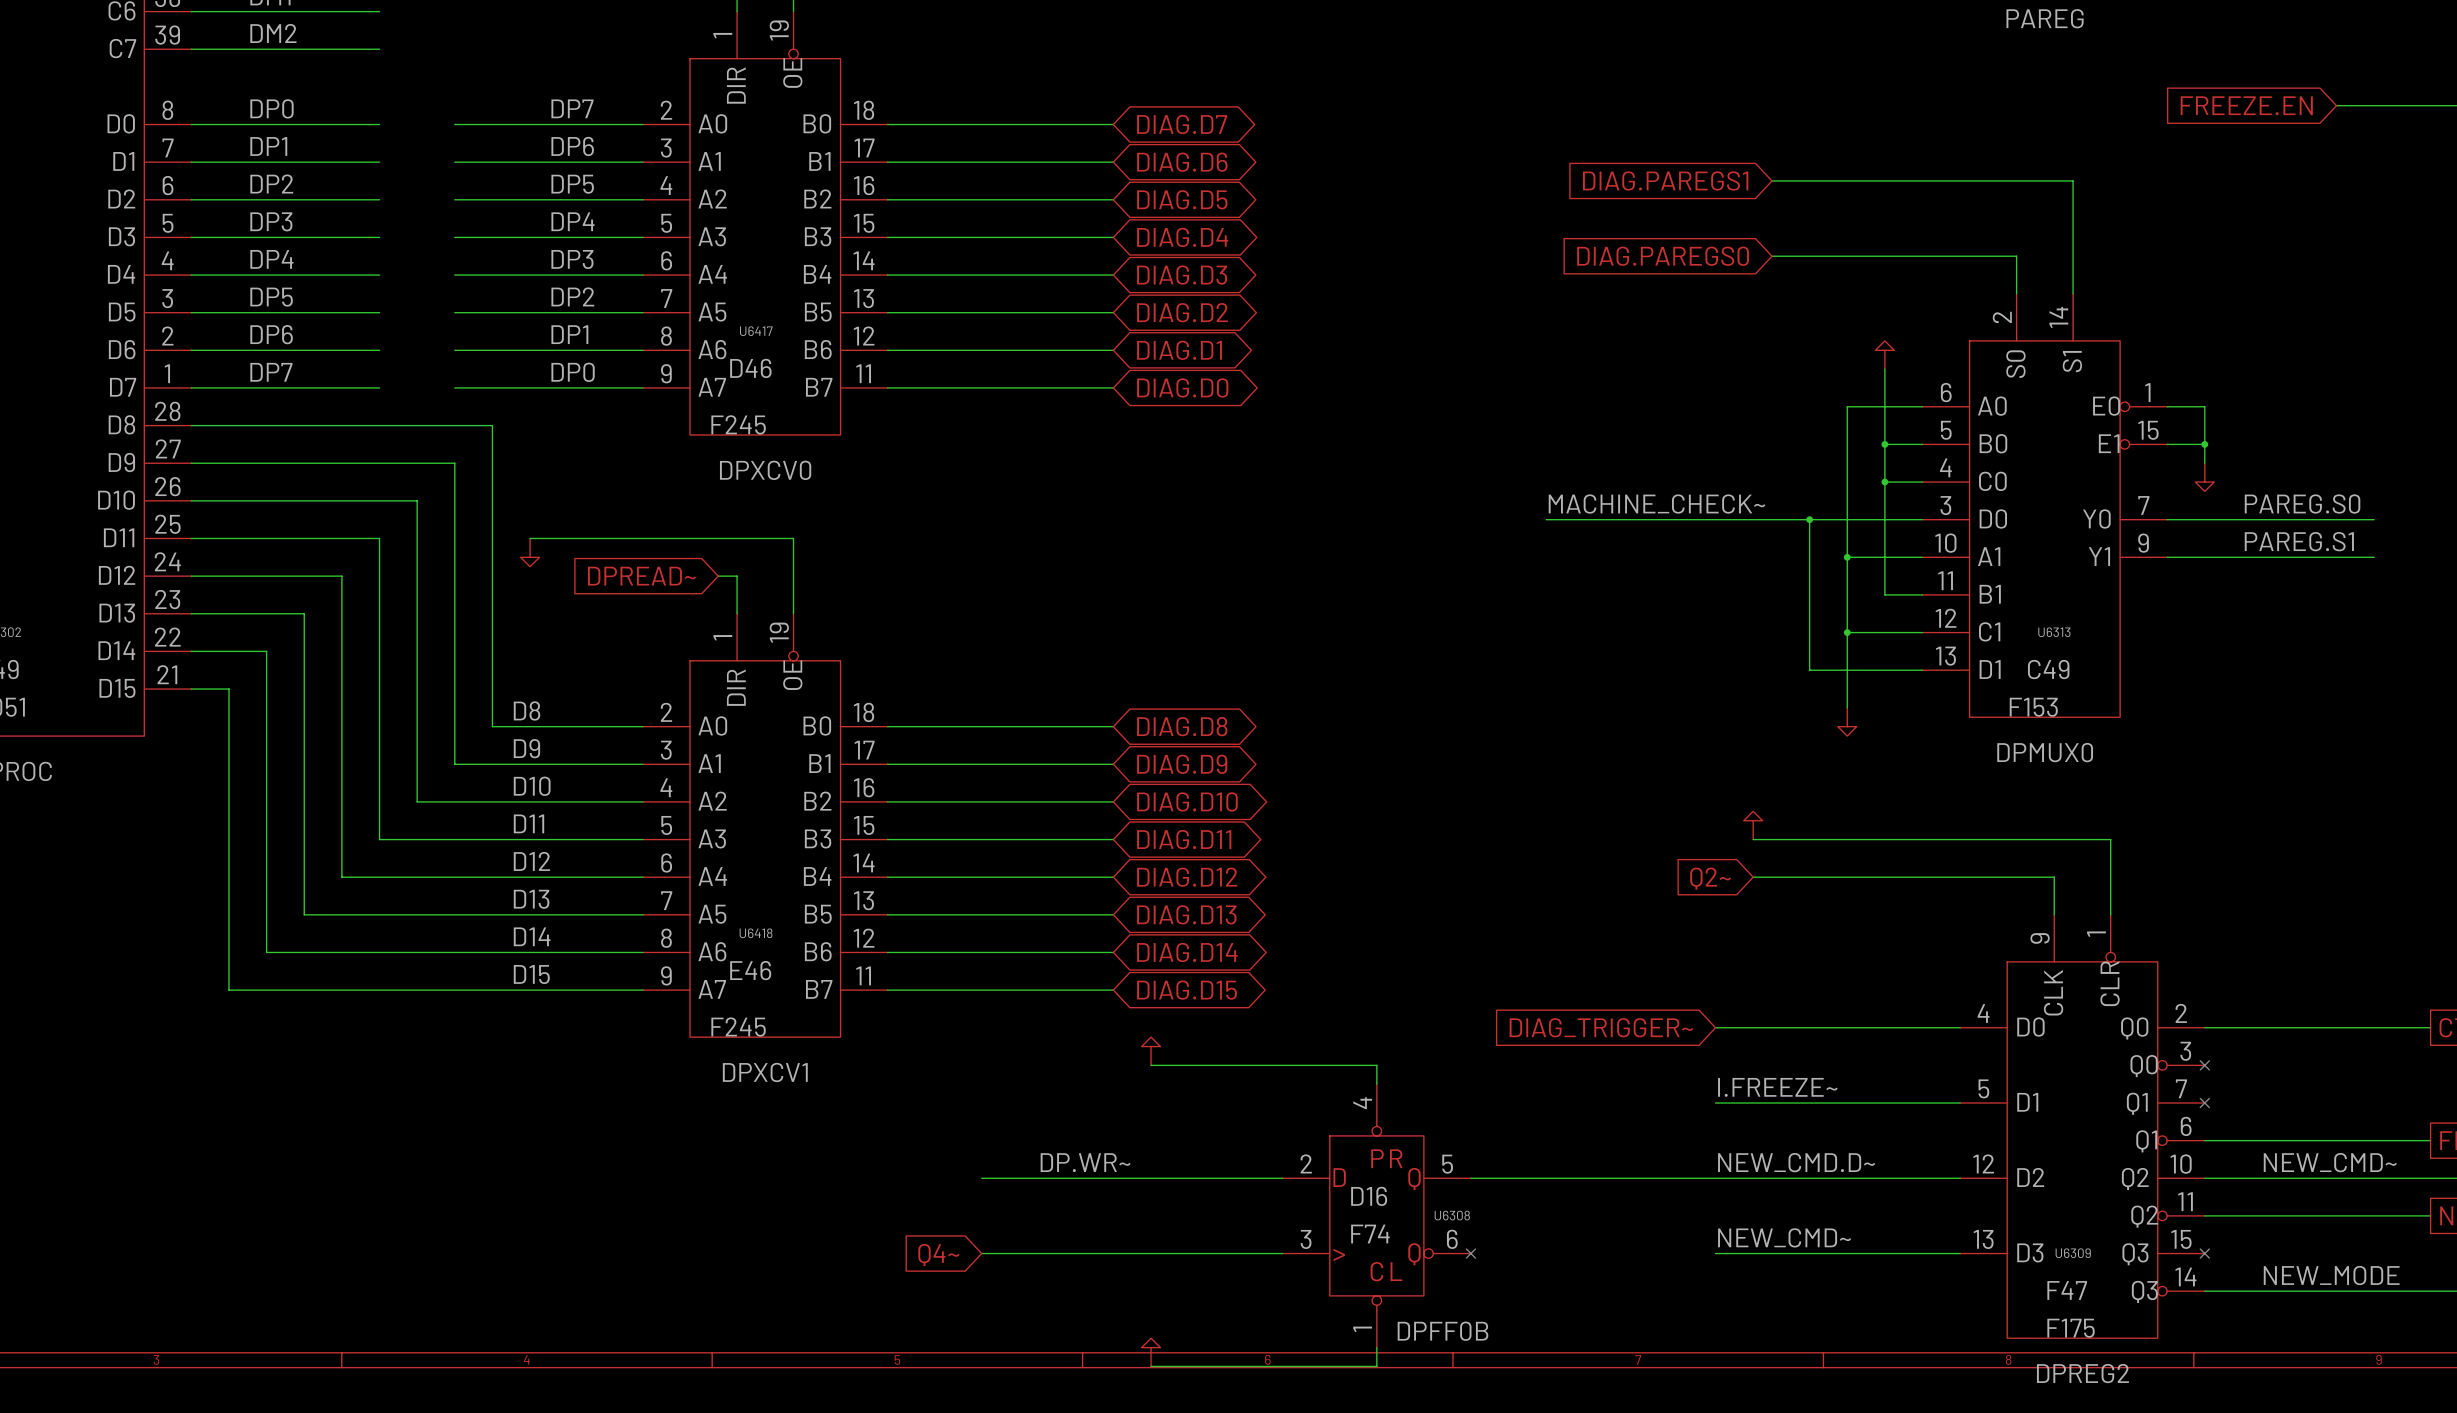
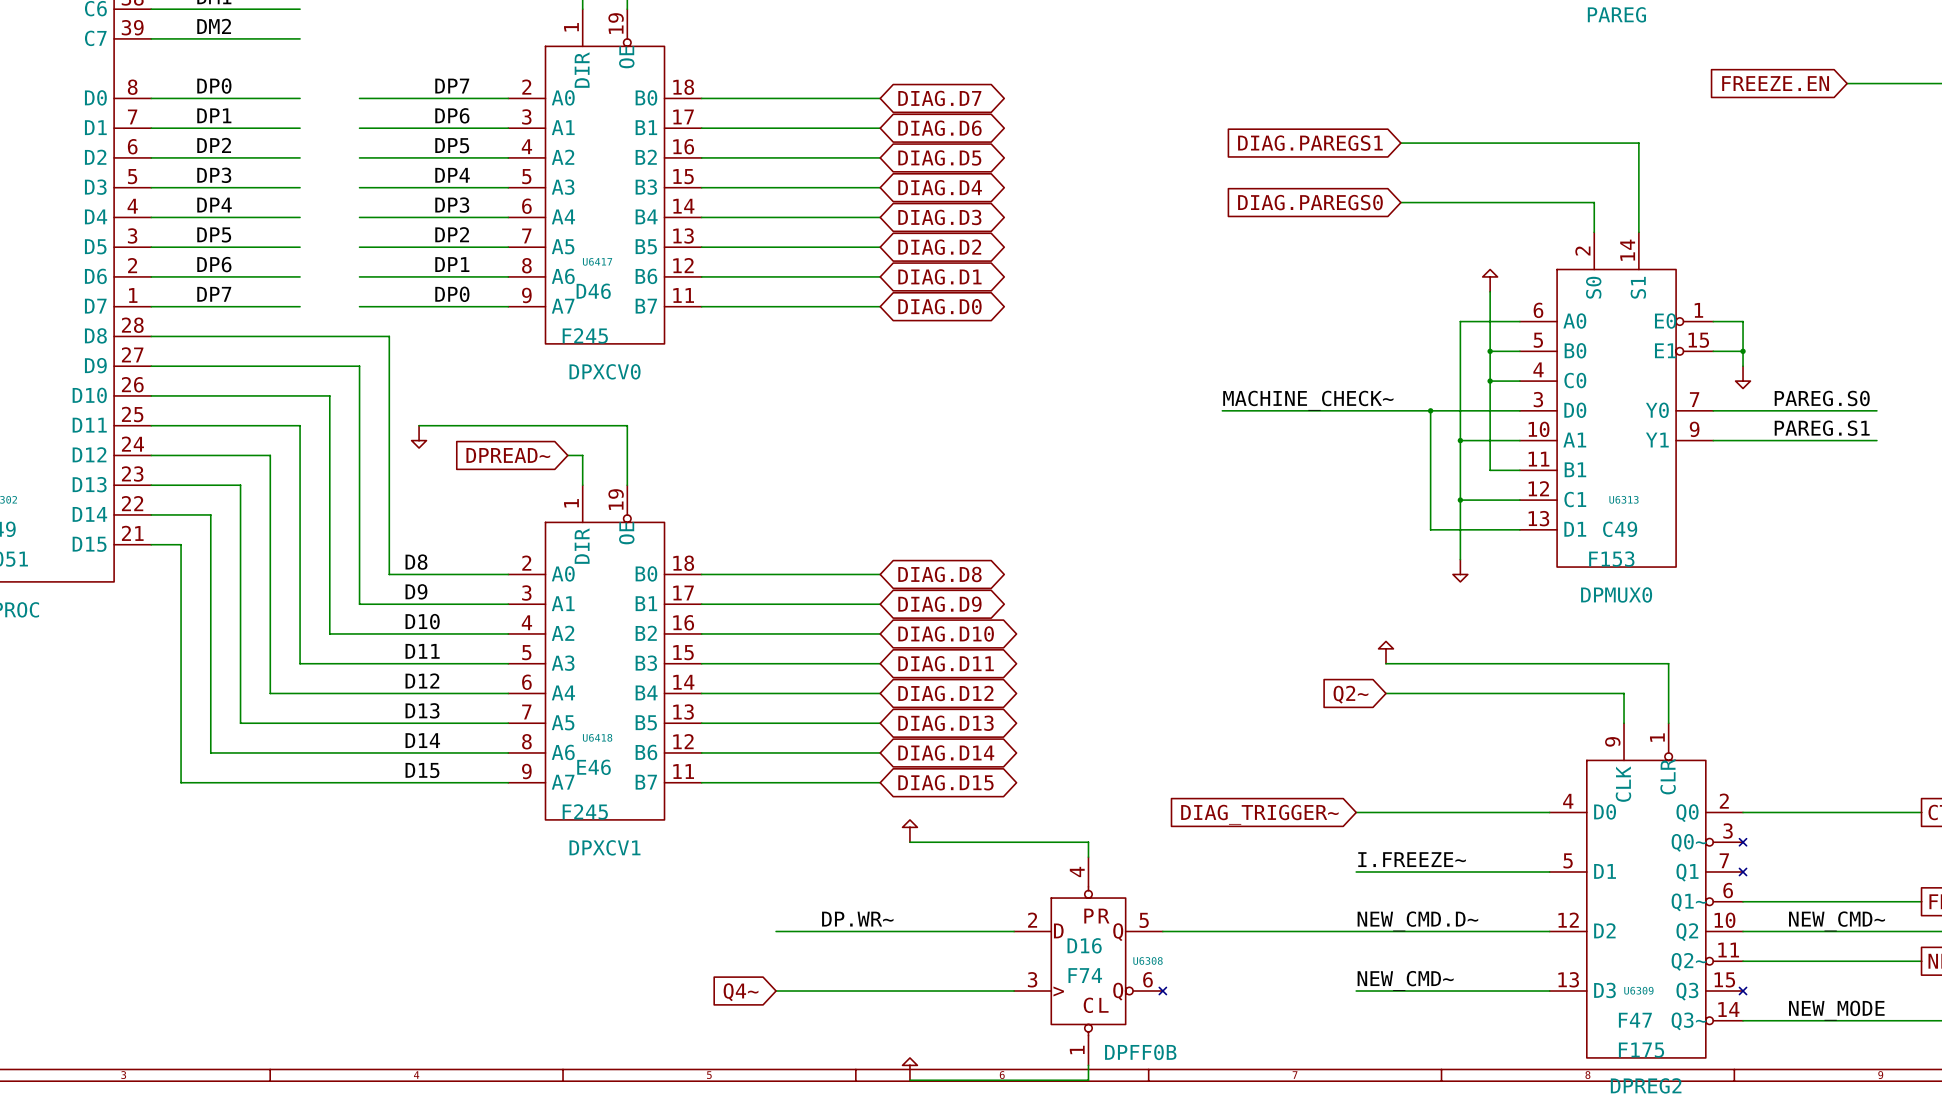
U6309 pin name: Q0 (2144, 1066) -> Q0~ (1689, 842)
U6309 pin name: Q1 (2146, 1141) -> Q1~ (1689, 902)
U6309 pin name: Q2 (2144, 1216) -> Q2~ (1689, 961)
U6309 pin name: Q3 (2144, 1291) -> Q3~ (1689, 1021)

